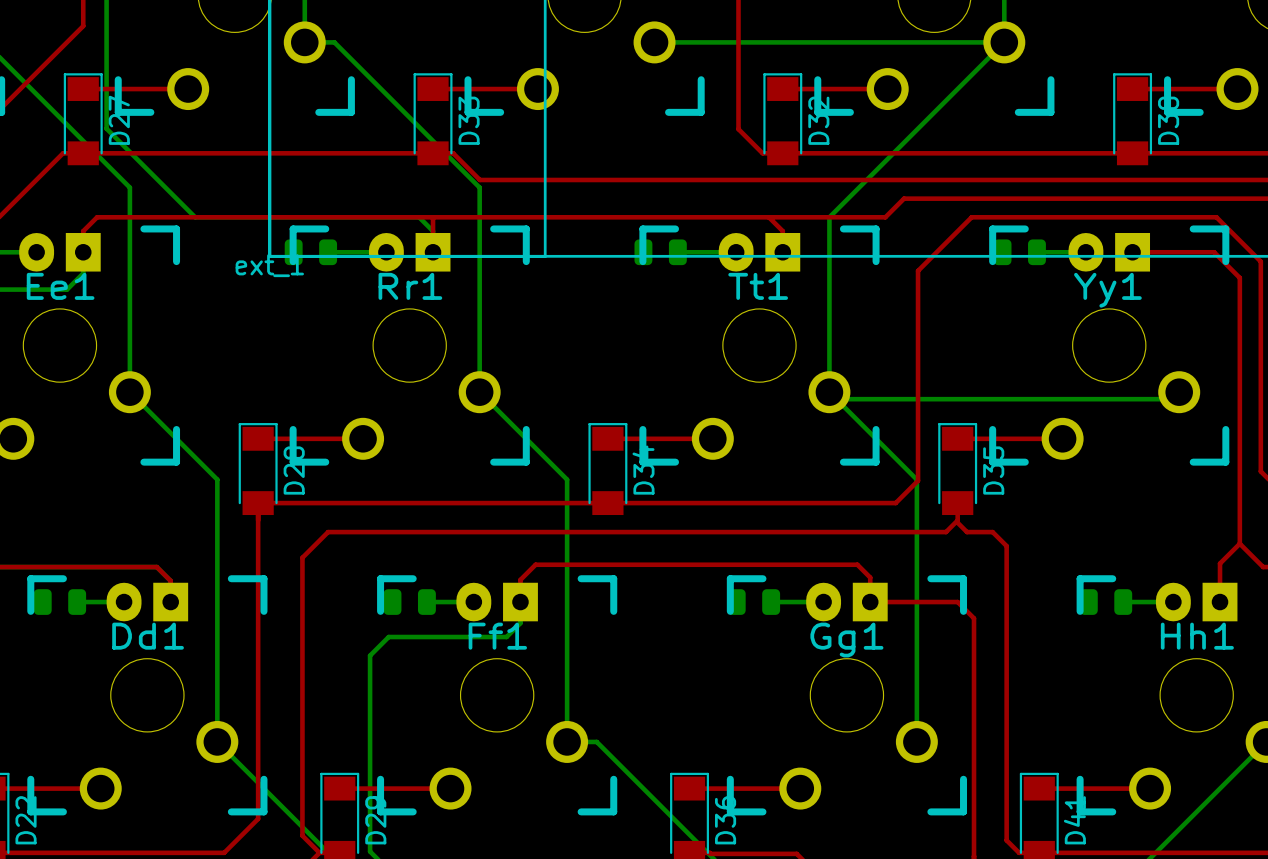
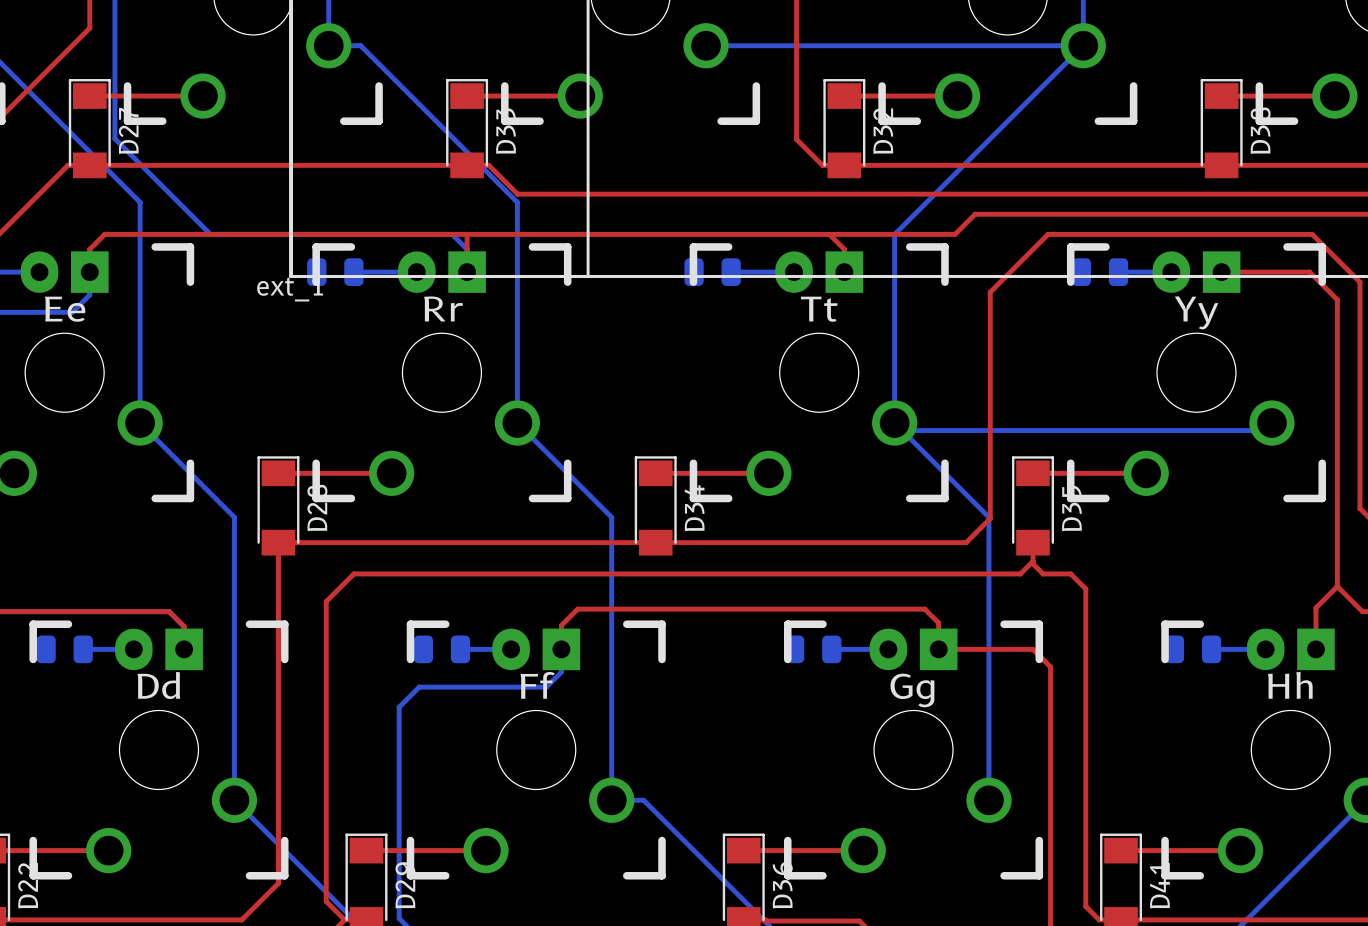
Ee1 name: Ee1 (60, 286) -> Ee (65, 309)
Rr1 name: Rr1 (410, 286) -> Rr (443, 308)
Tt1 name: Tt1 (758, 286) -> Tt (819, 309)
Yy1 name: Yy1 (1107, 290) -> Yy (1196, 312)
Dd1 name: Dd1 (148, 636) -> Dd (158, 685)
Ff1 name: Ff1 (497, 636) -> Ff (537, 685)
Hh1 name: Hh1 (1197, 636) -> Hh (1290, 685)
Gg1 name: Gg1 (846, 640) -> Gg (912, 690)

